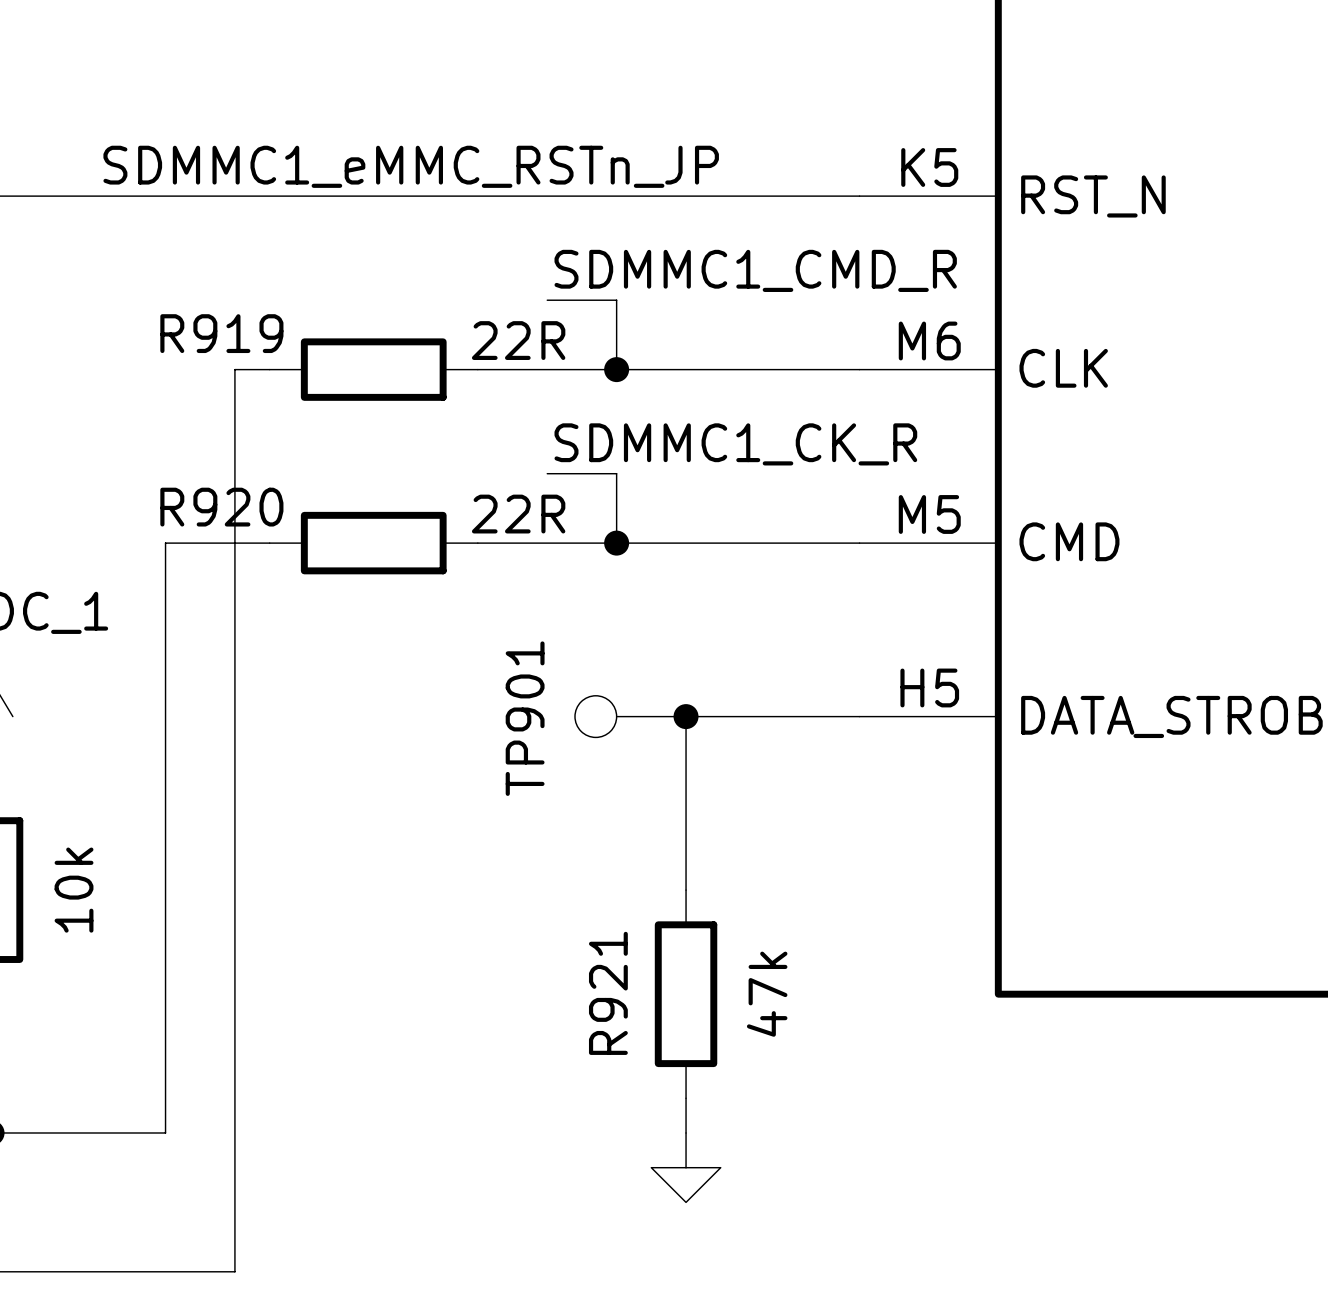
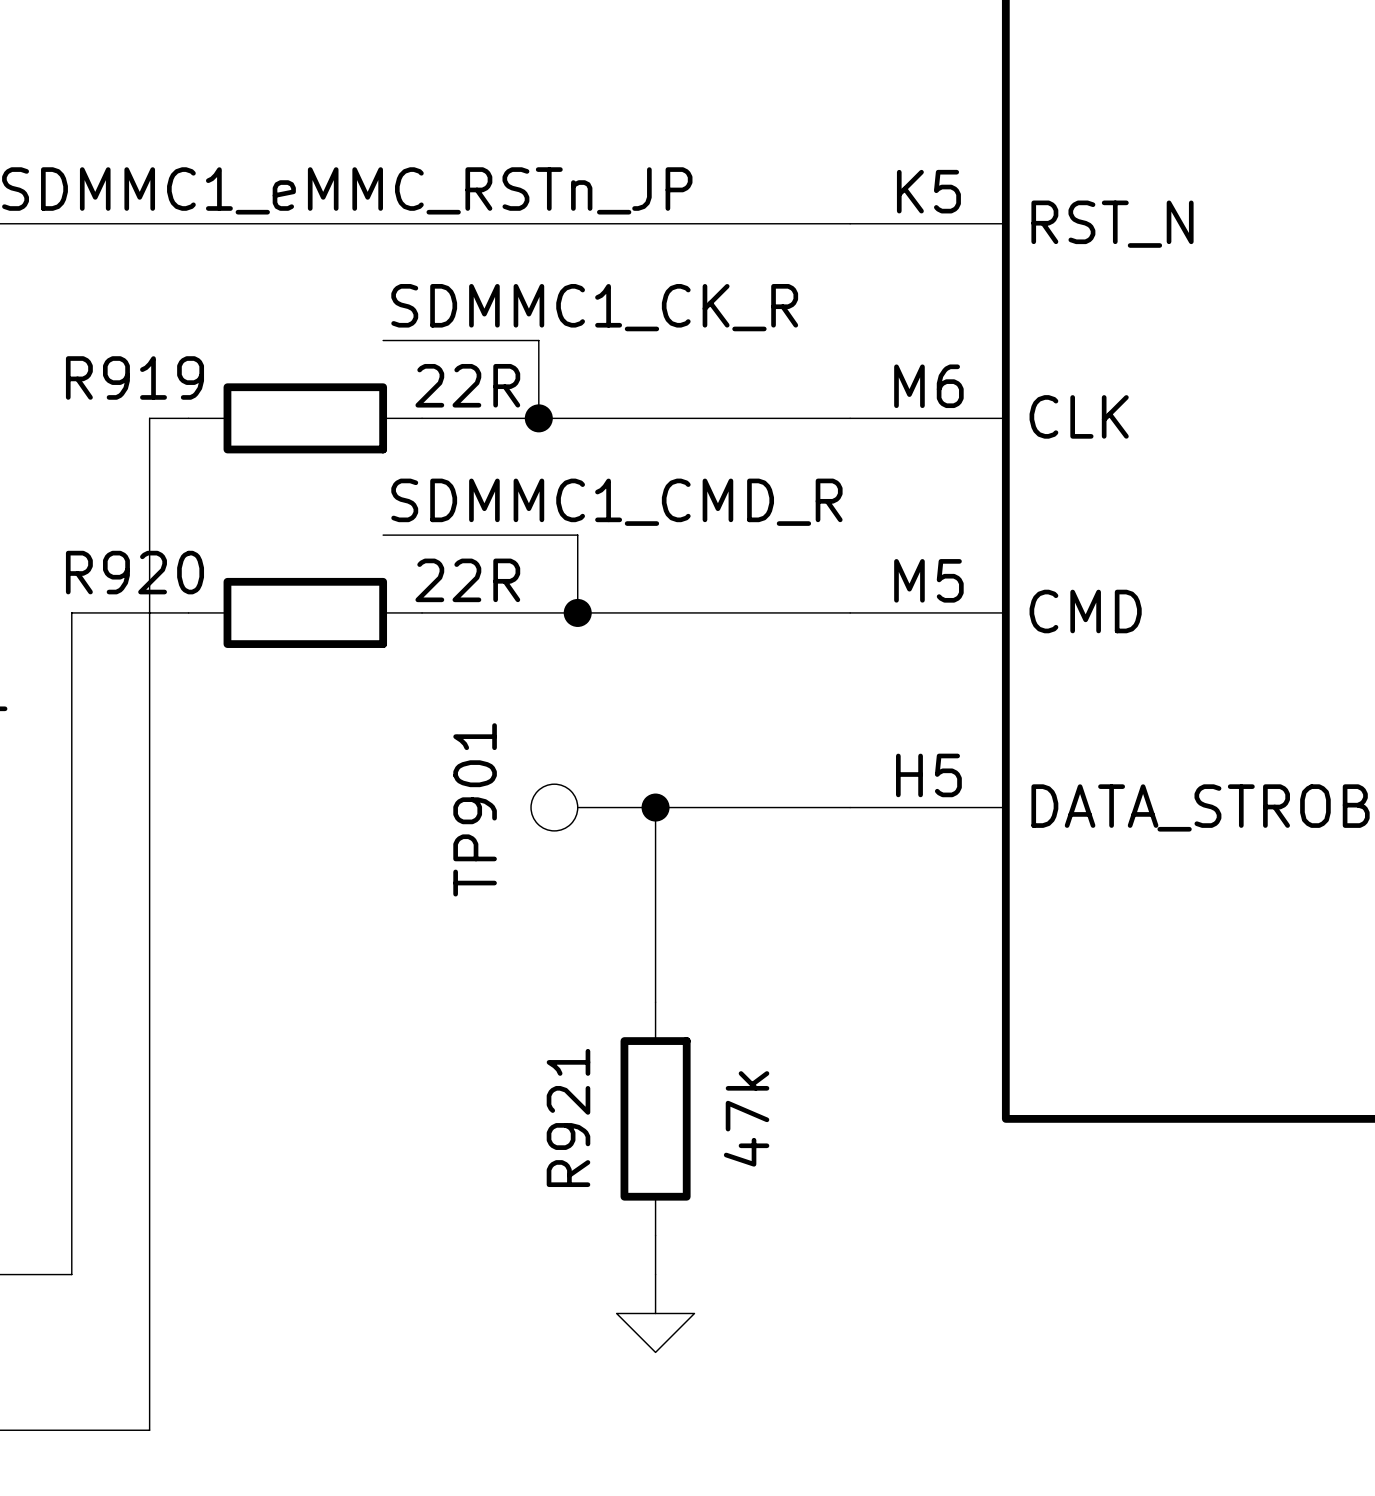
label position: SDMMC1_CMD_R (755, 270) -> SDMMC1_CMD_R (616, 502)
wire: none -> (383, 340) (499, 340)
wire: (581, 300) (616, 300) (616, 369) -> (538, 340) (538, 418)
junction position: (616, 369) -> (538, 418)
label position: SDMMC1_CK_R (735, 444) -> SDMMC1_CK_R (594, 307)
wire: none -> (383, 535) (499, 535)

